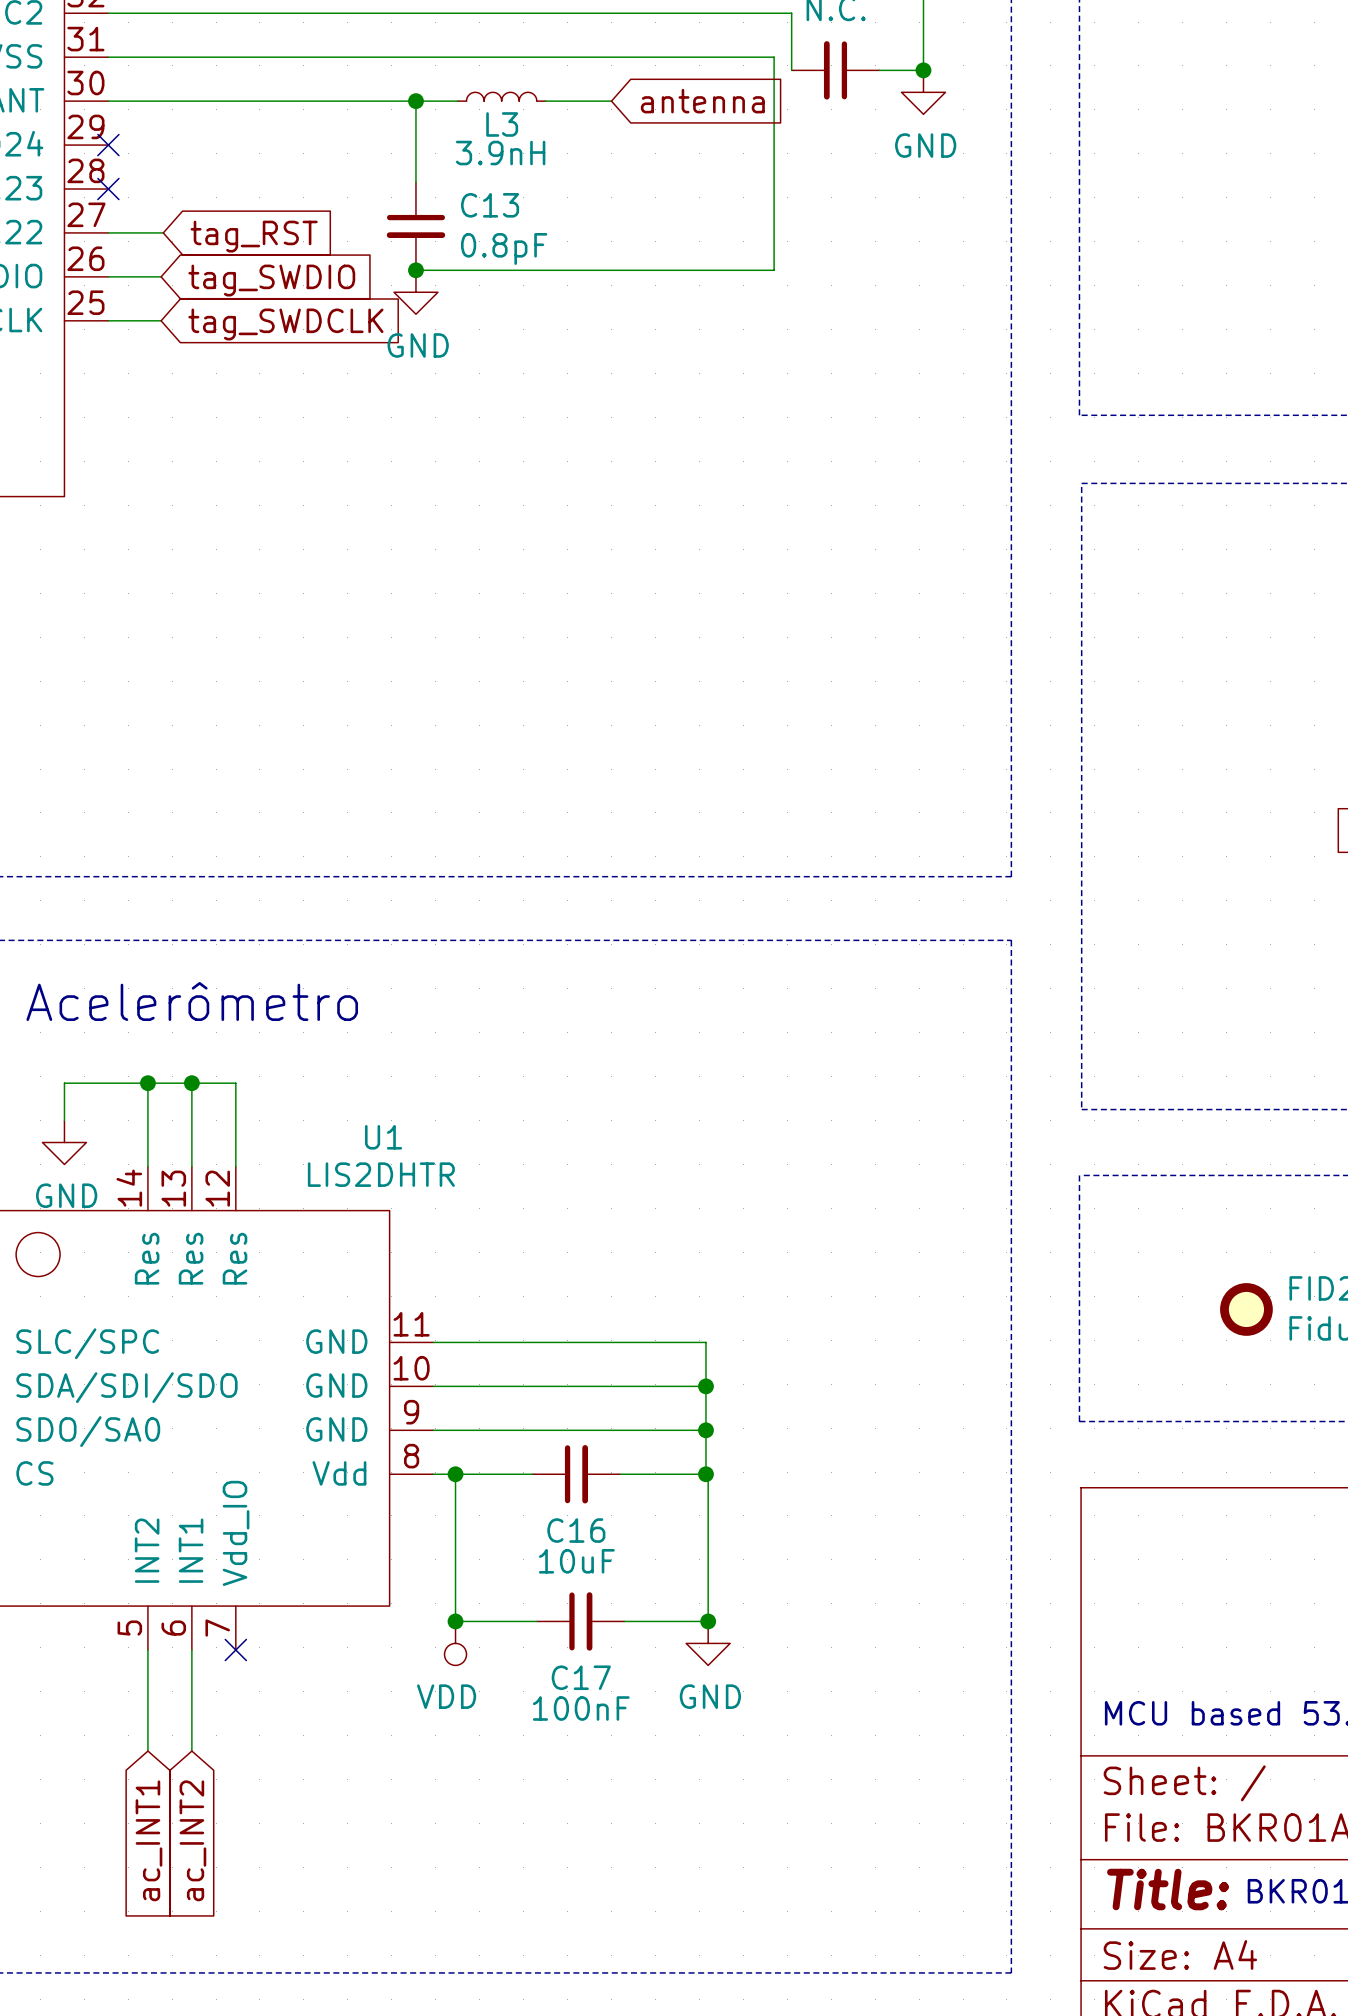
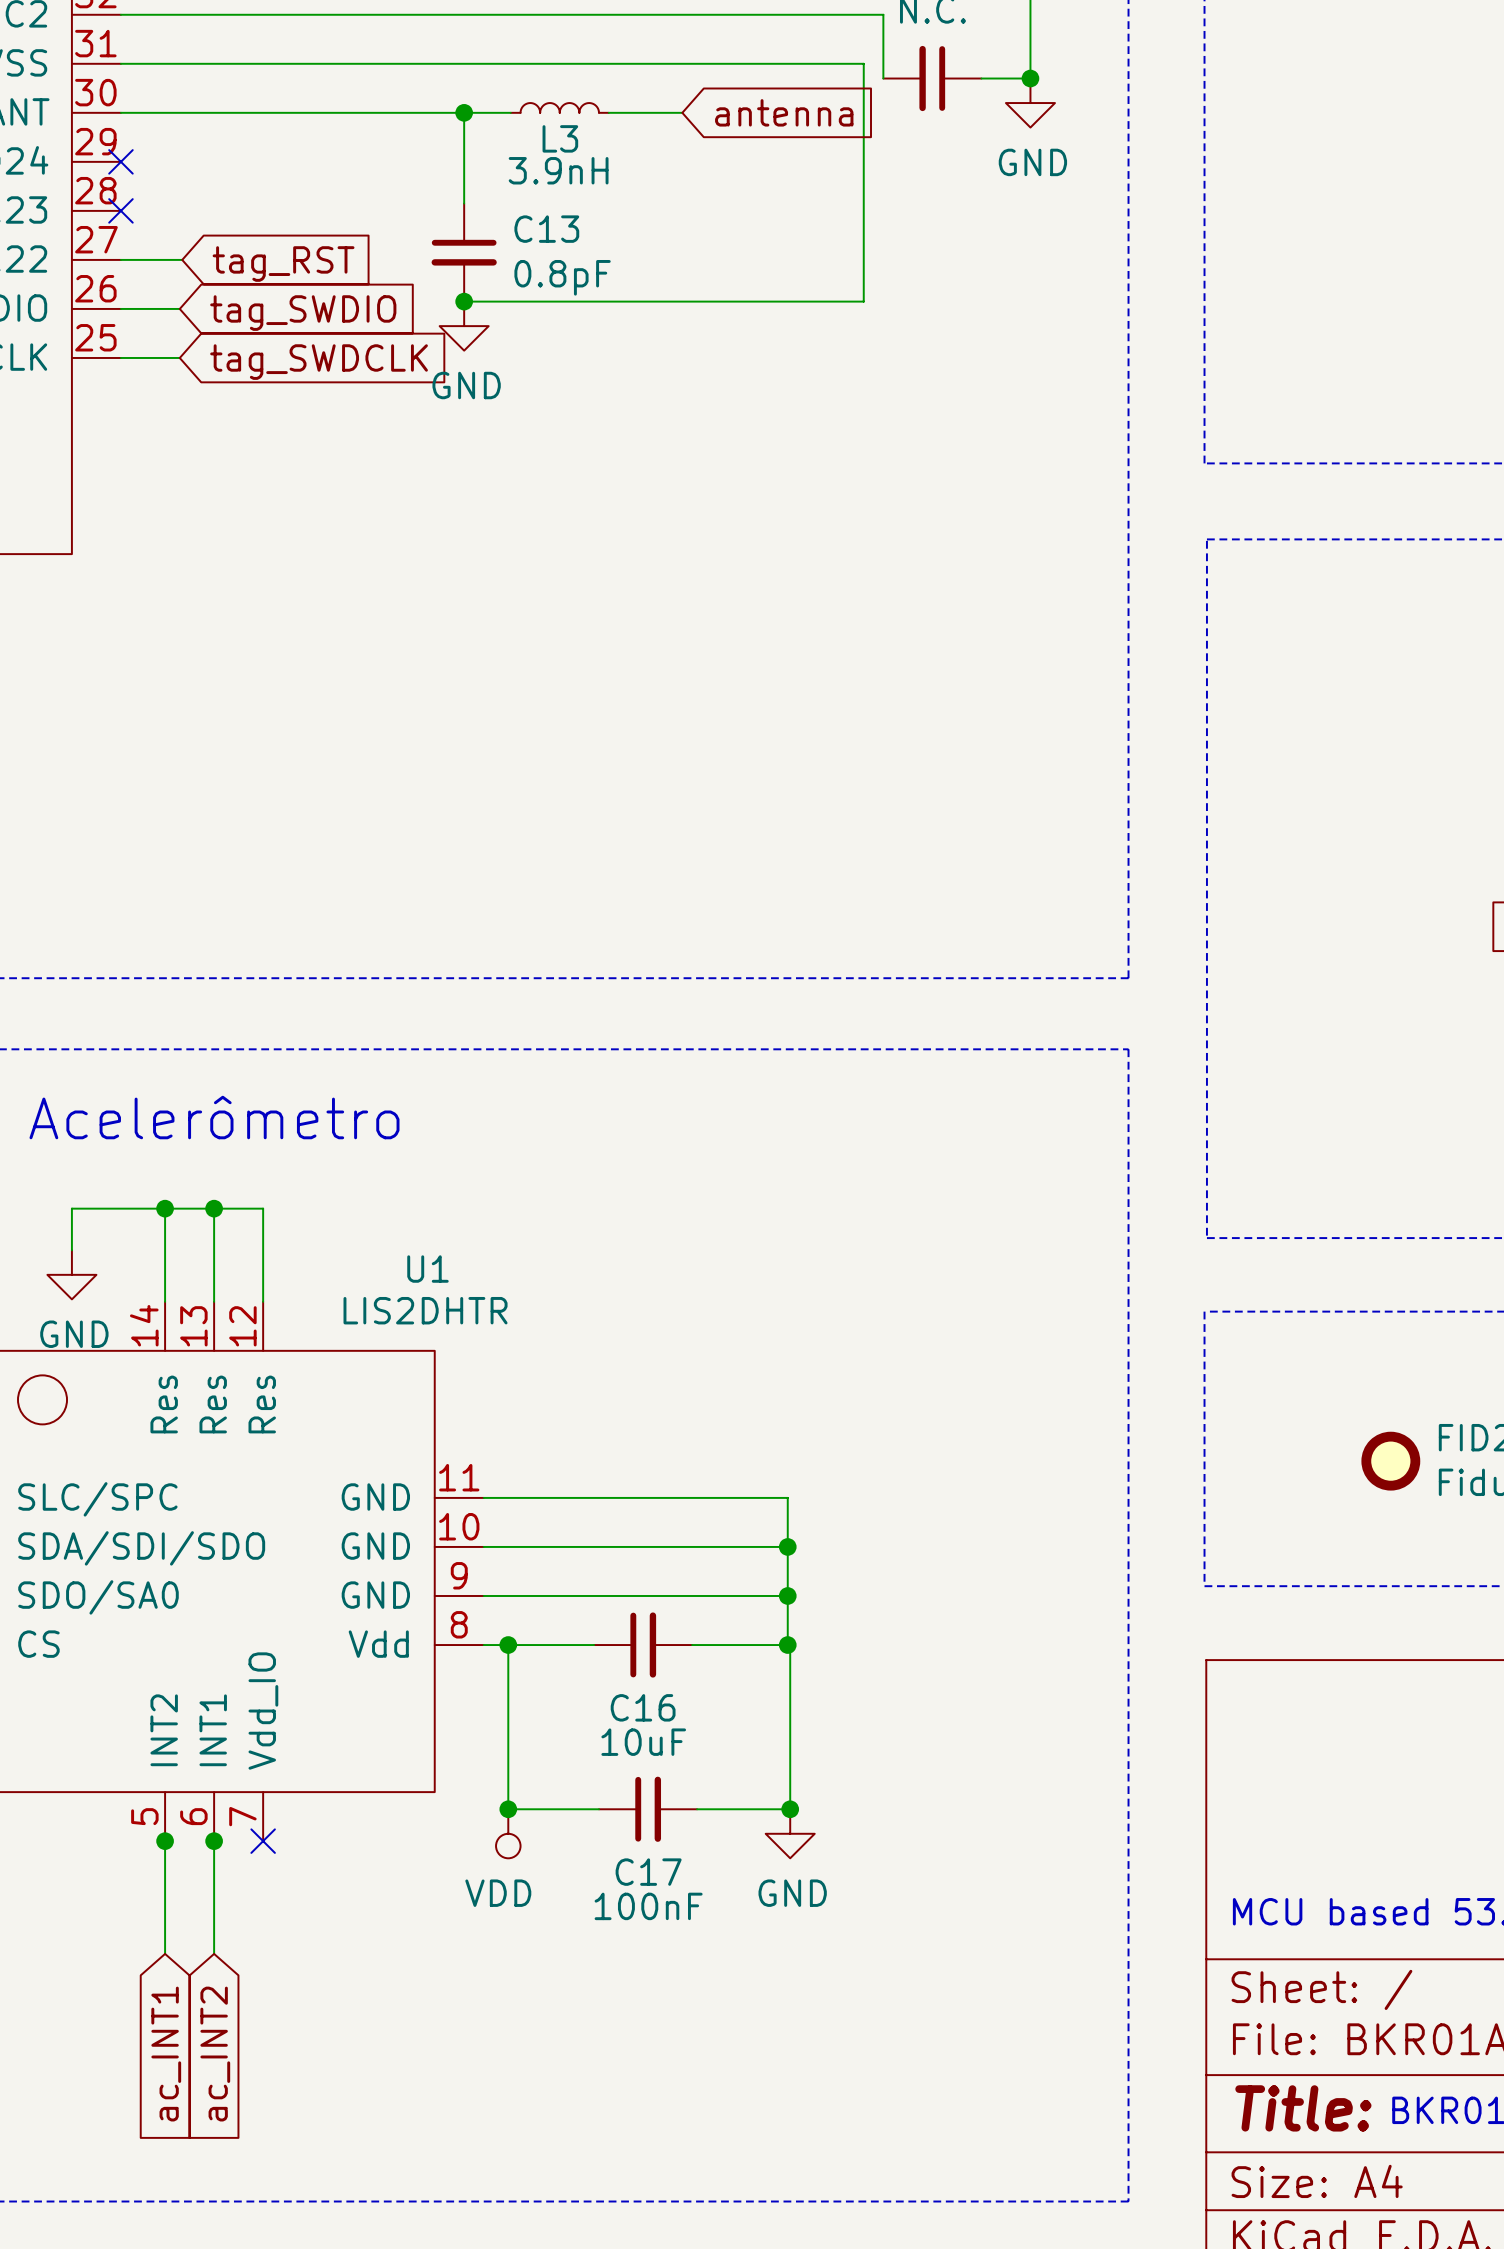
junction: none -> (165, 1841)
junction: none -> (214, 1841)

